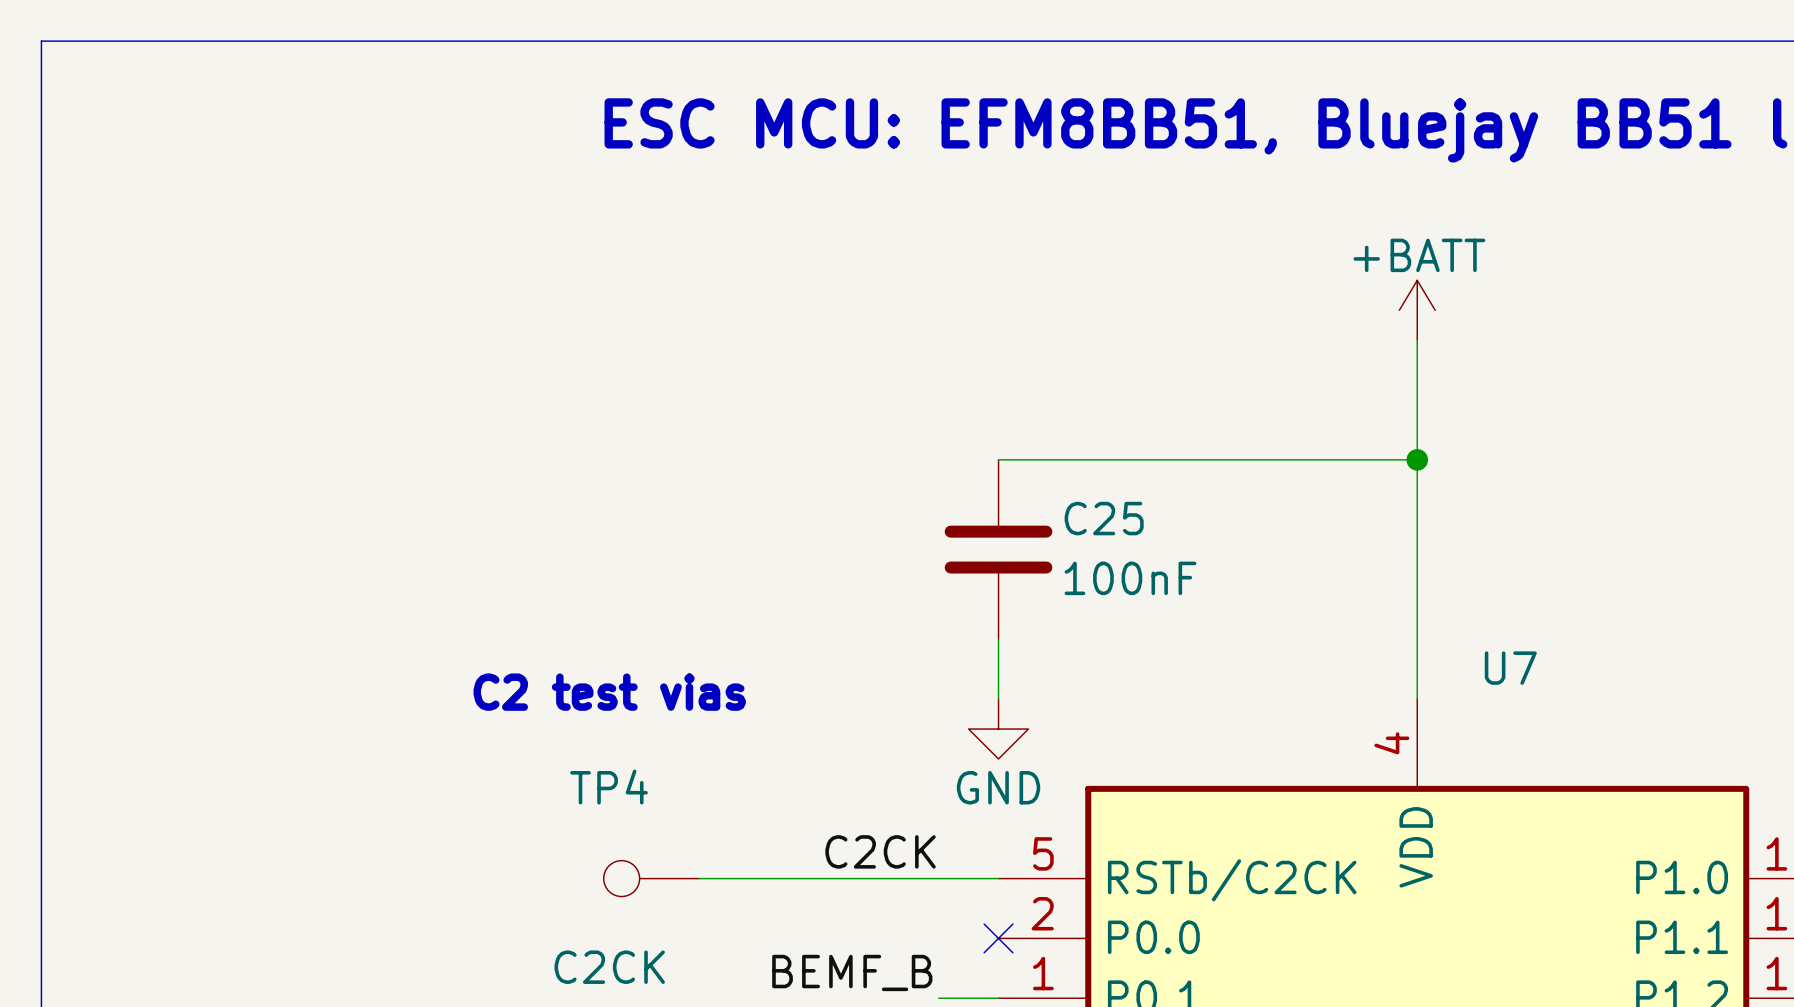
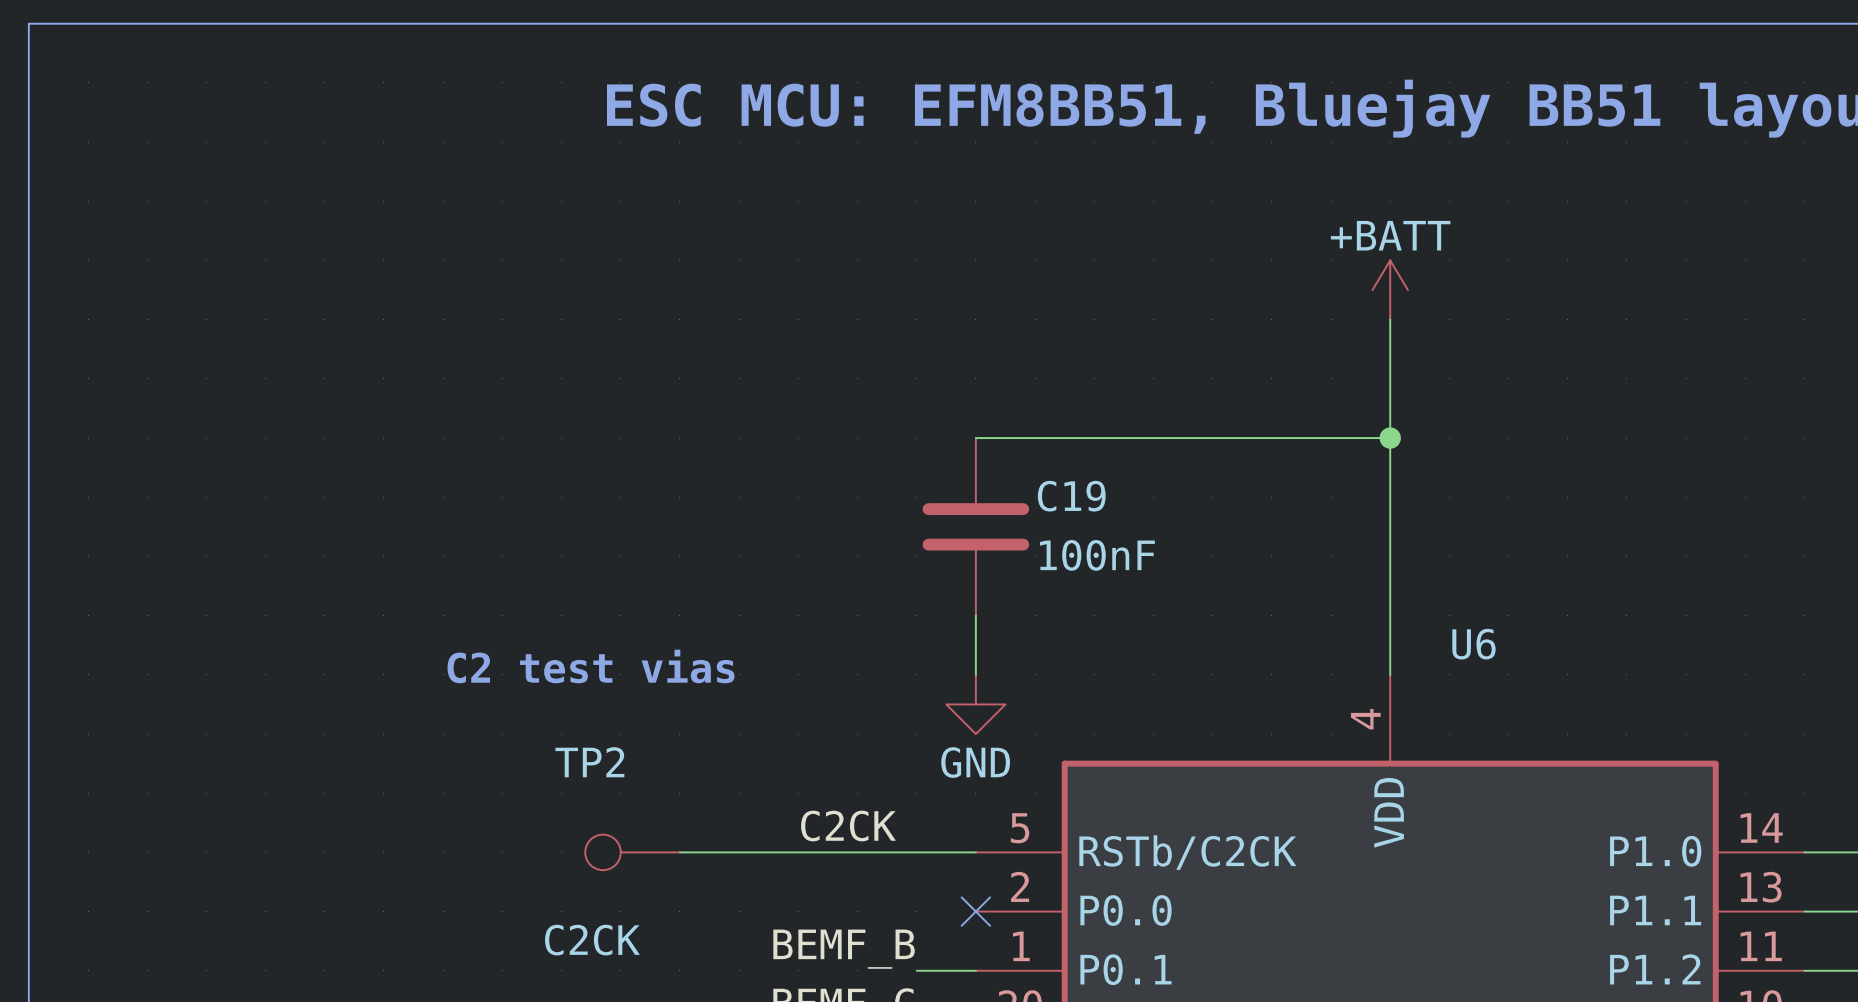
C25 name: C25 (1104, 518) -> C19 (1071, 496)
U7 name: U7 (1510, 668) -> U6 (1473, 644)
TP4 name: TP4 (608, 787) -> TP2 (589, 762)

